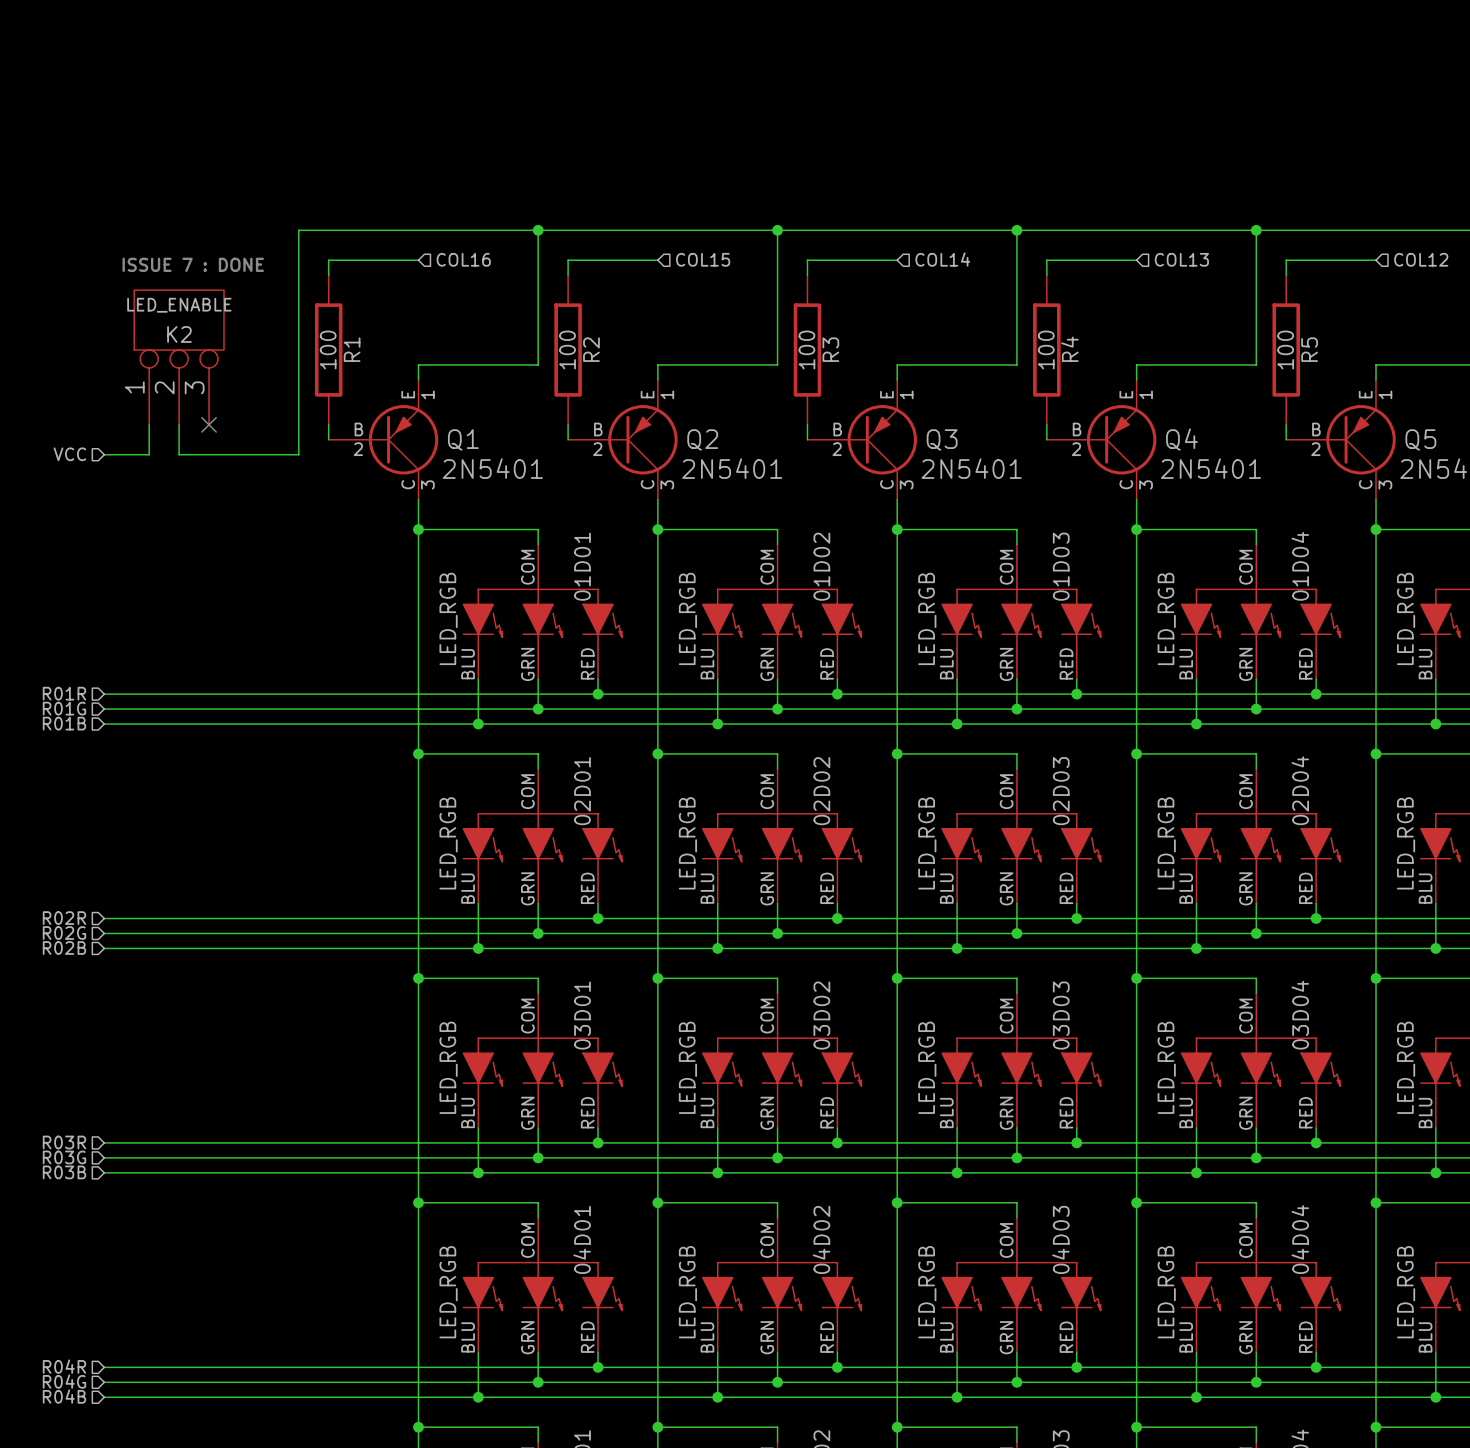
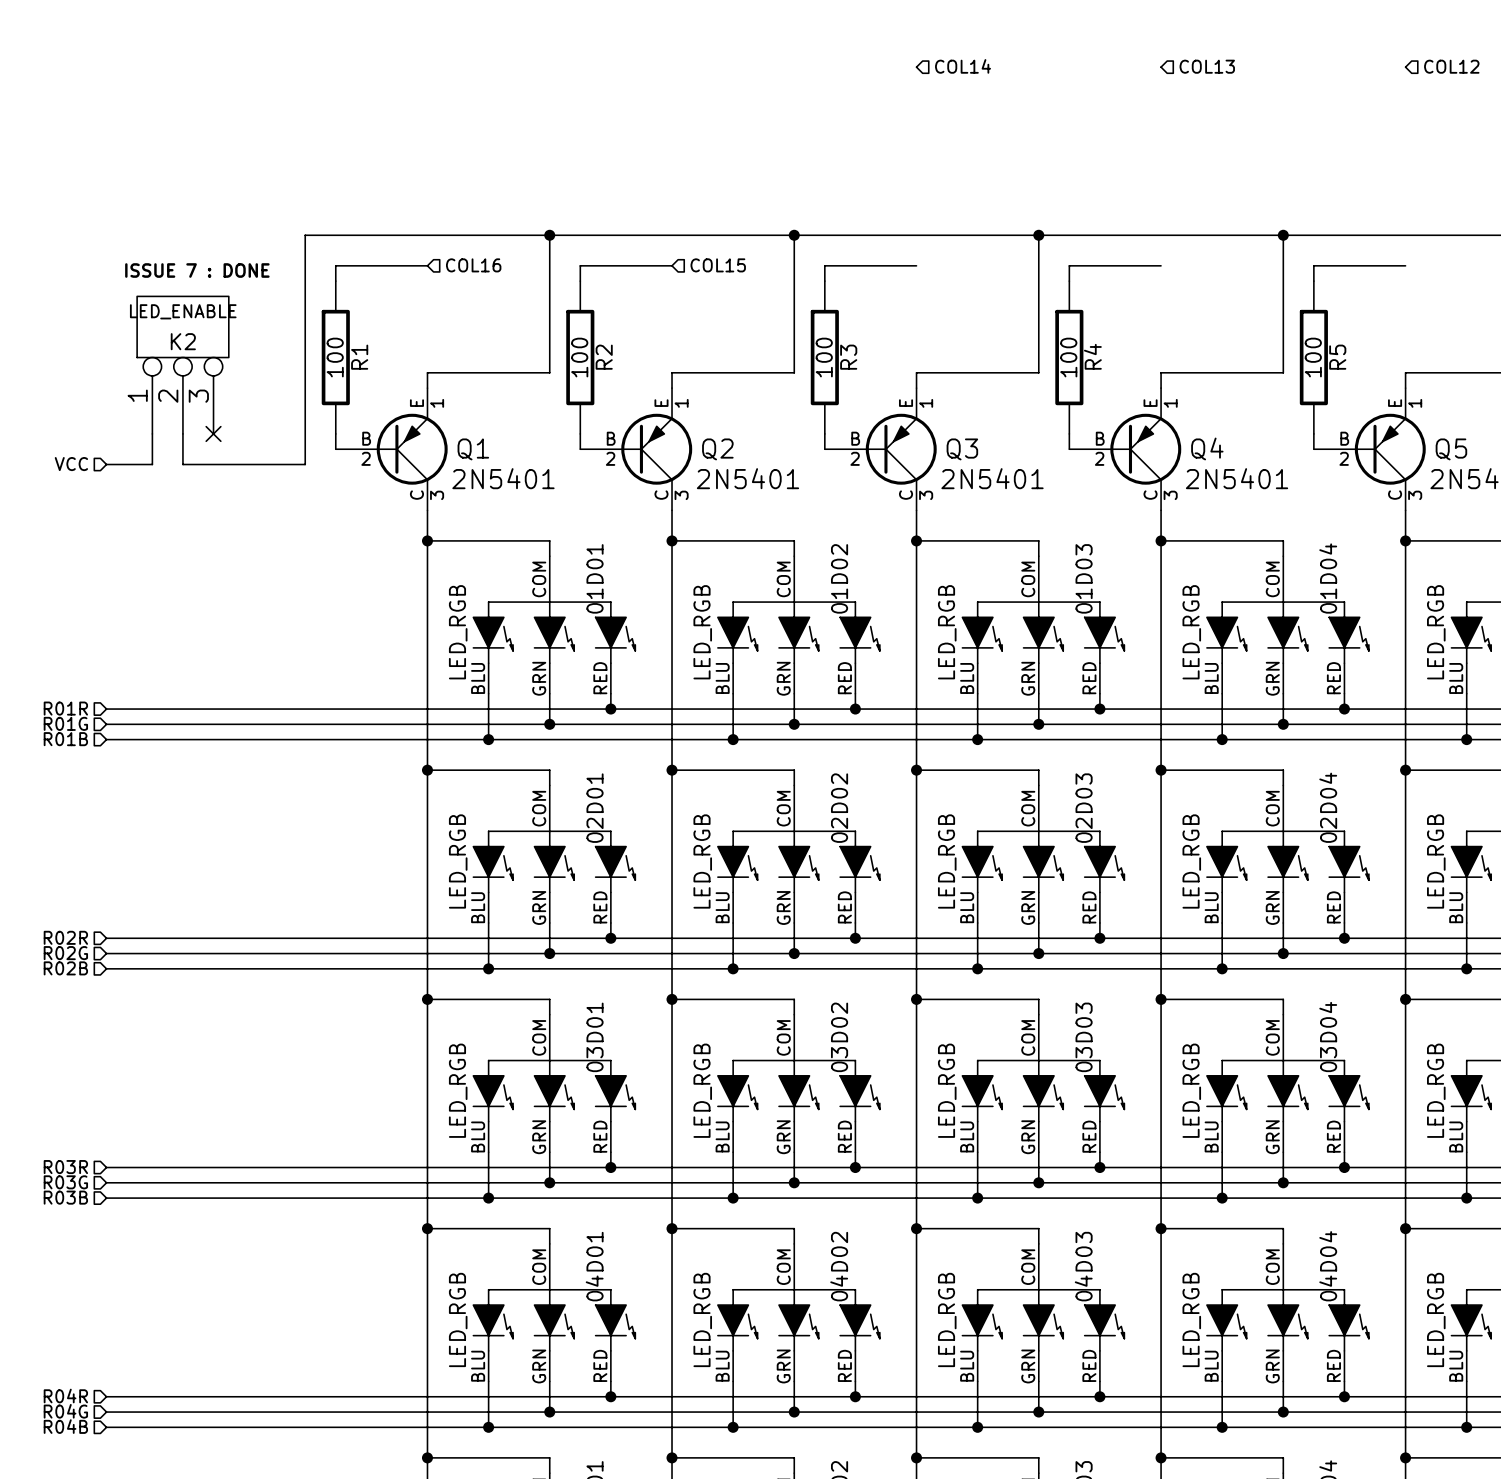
hierarchical label position: COL14 (942, 259) -> COL14 (963, 66)
hierarchical label position: COL13 (1181, 259) -> COL13 (1207, 66)
hierarchical label position: COL12 (1421, 259) -> COL12 (1451, 66)

